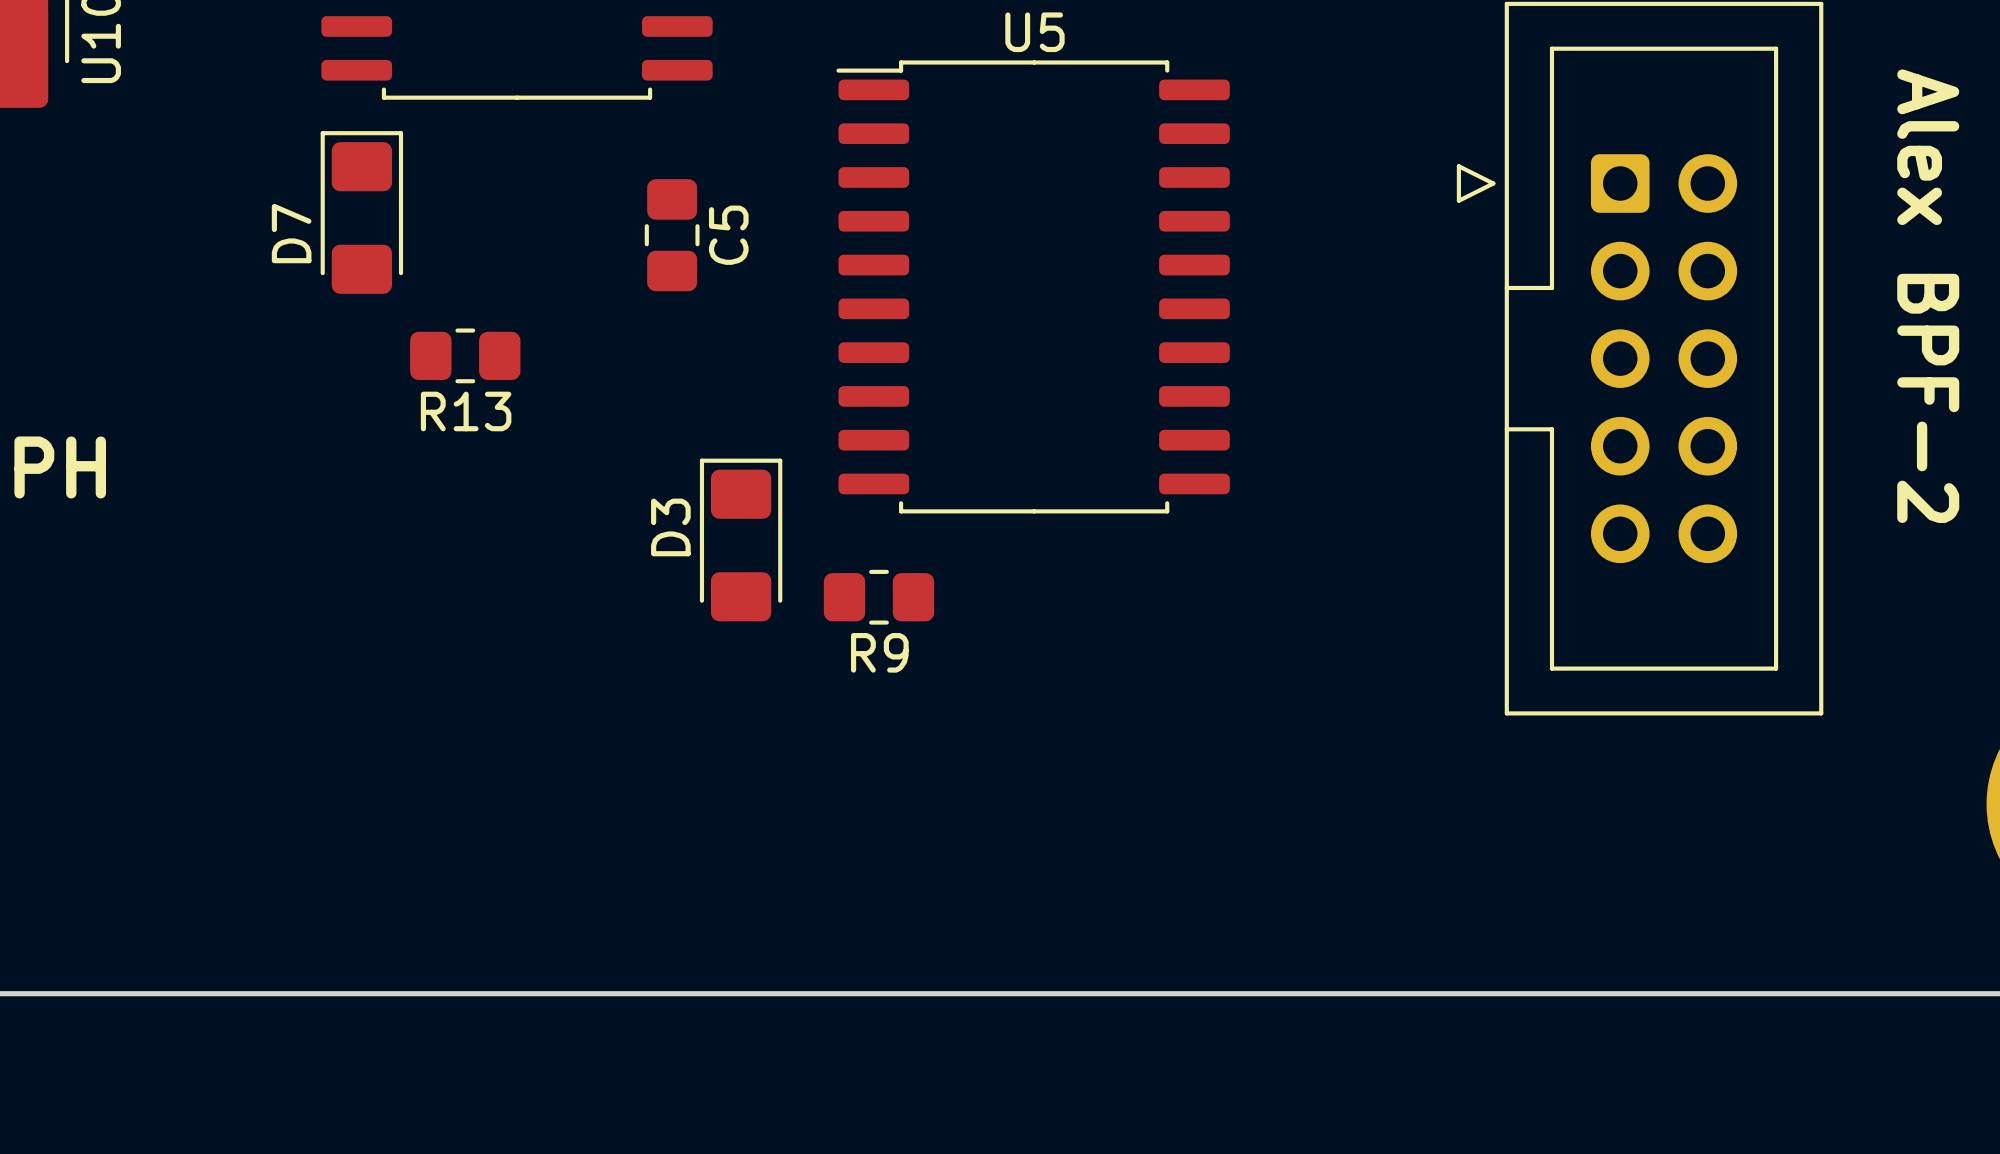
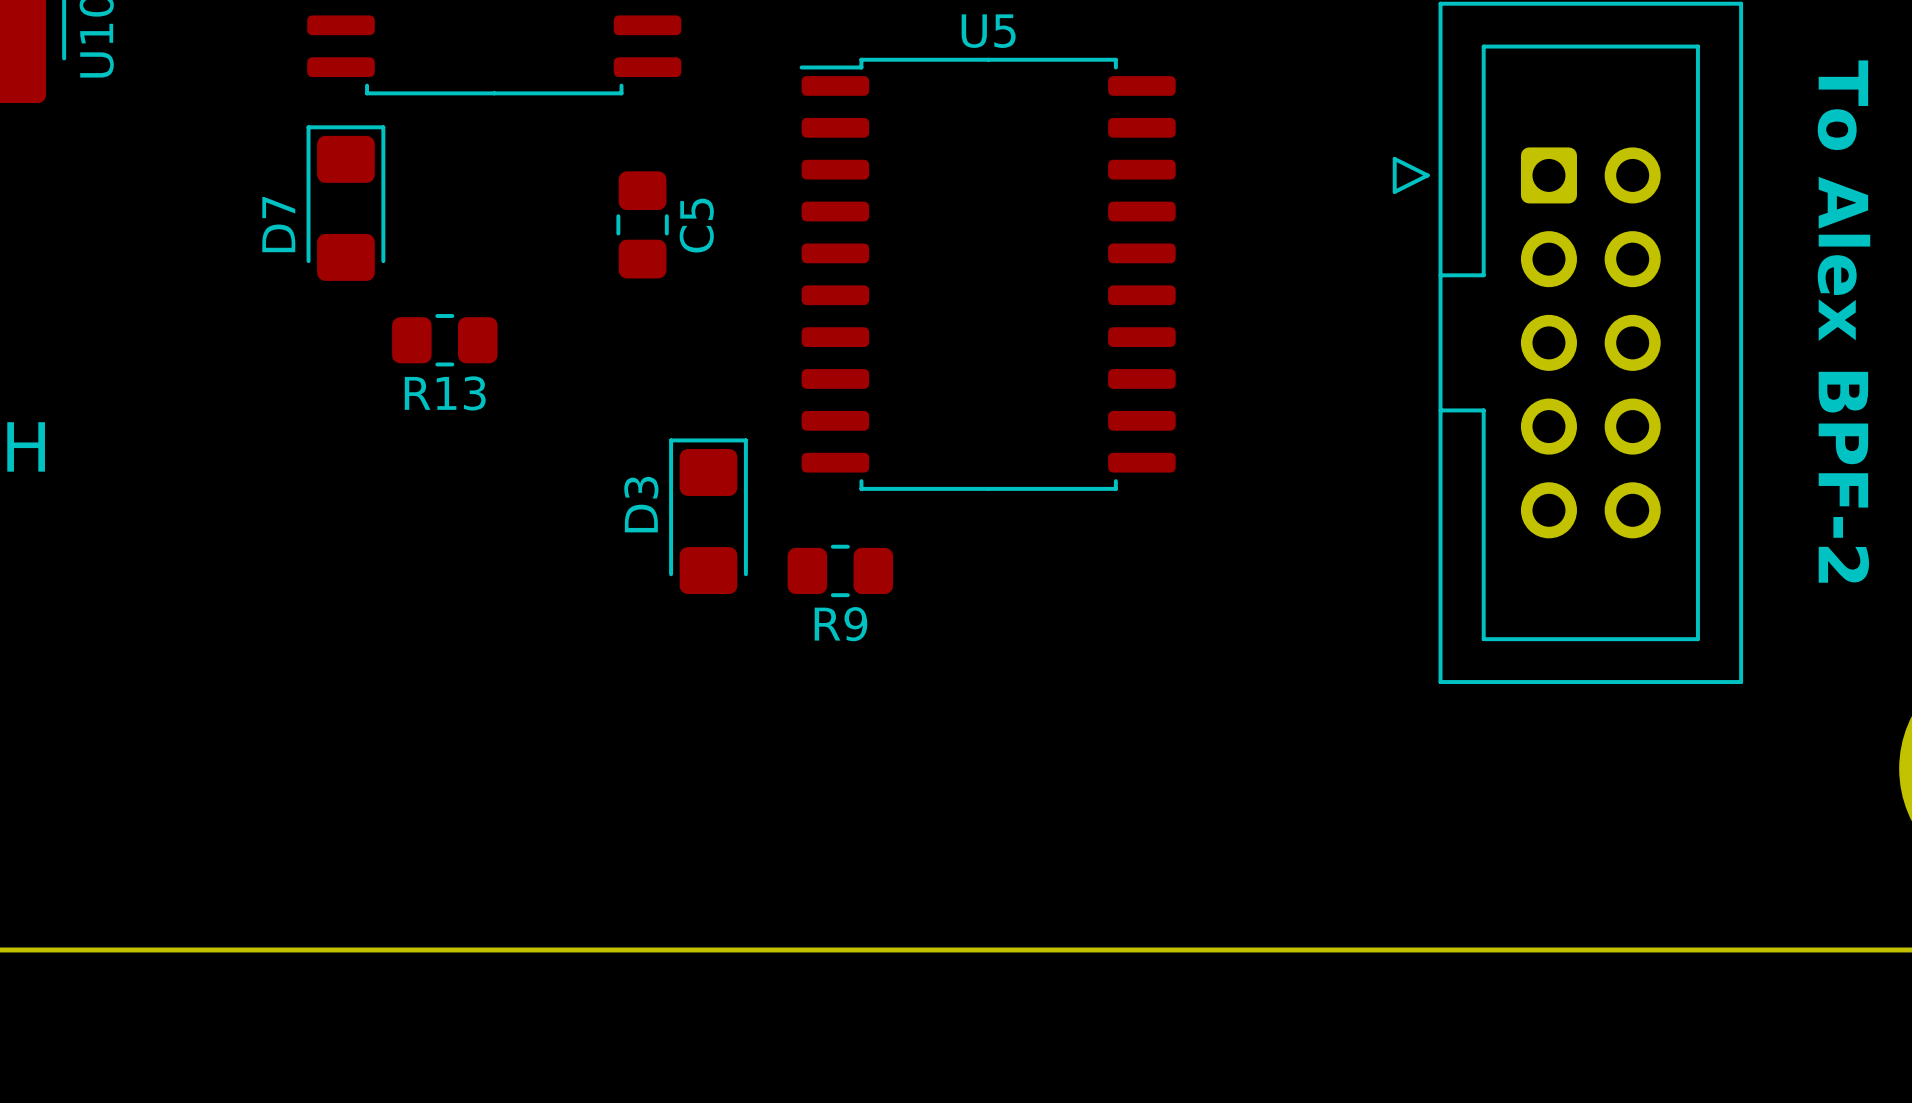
text: Alex BPF-2 (1928, 296) -> To Alex BPF-2 (1843, 321)

